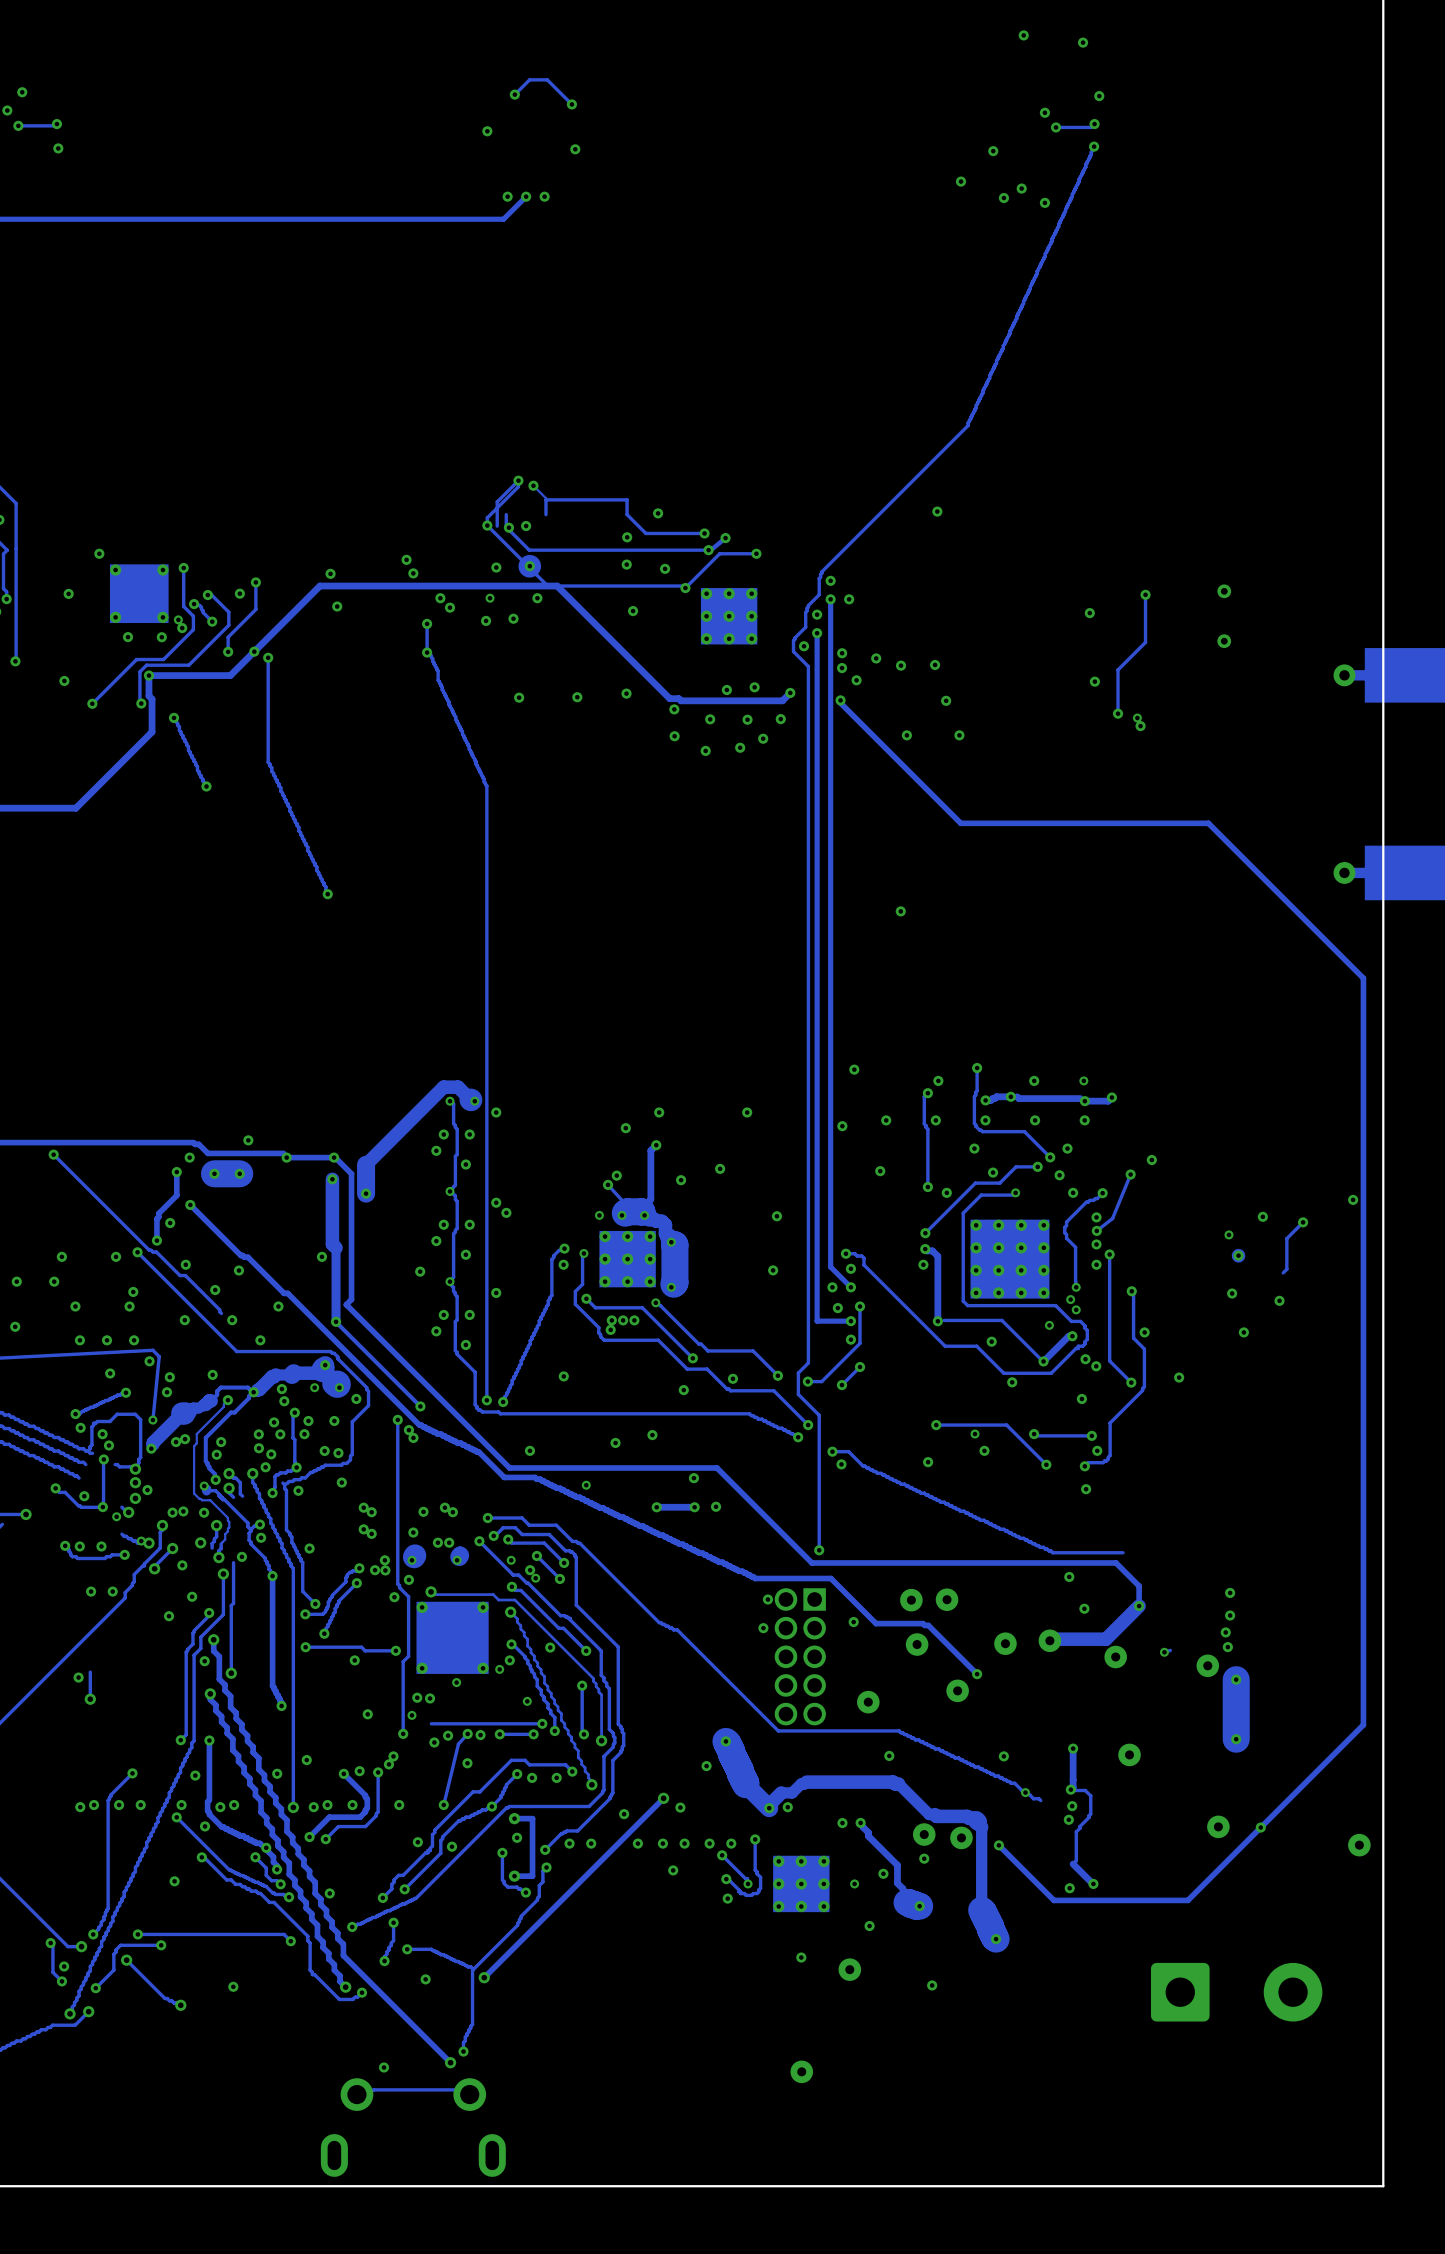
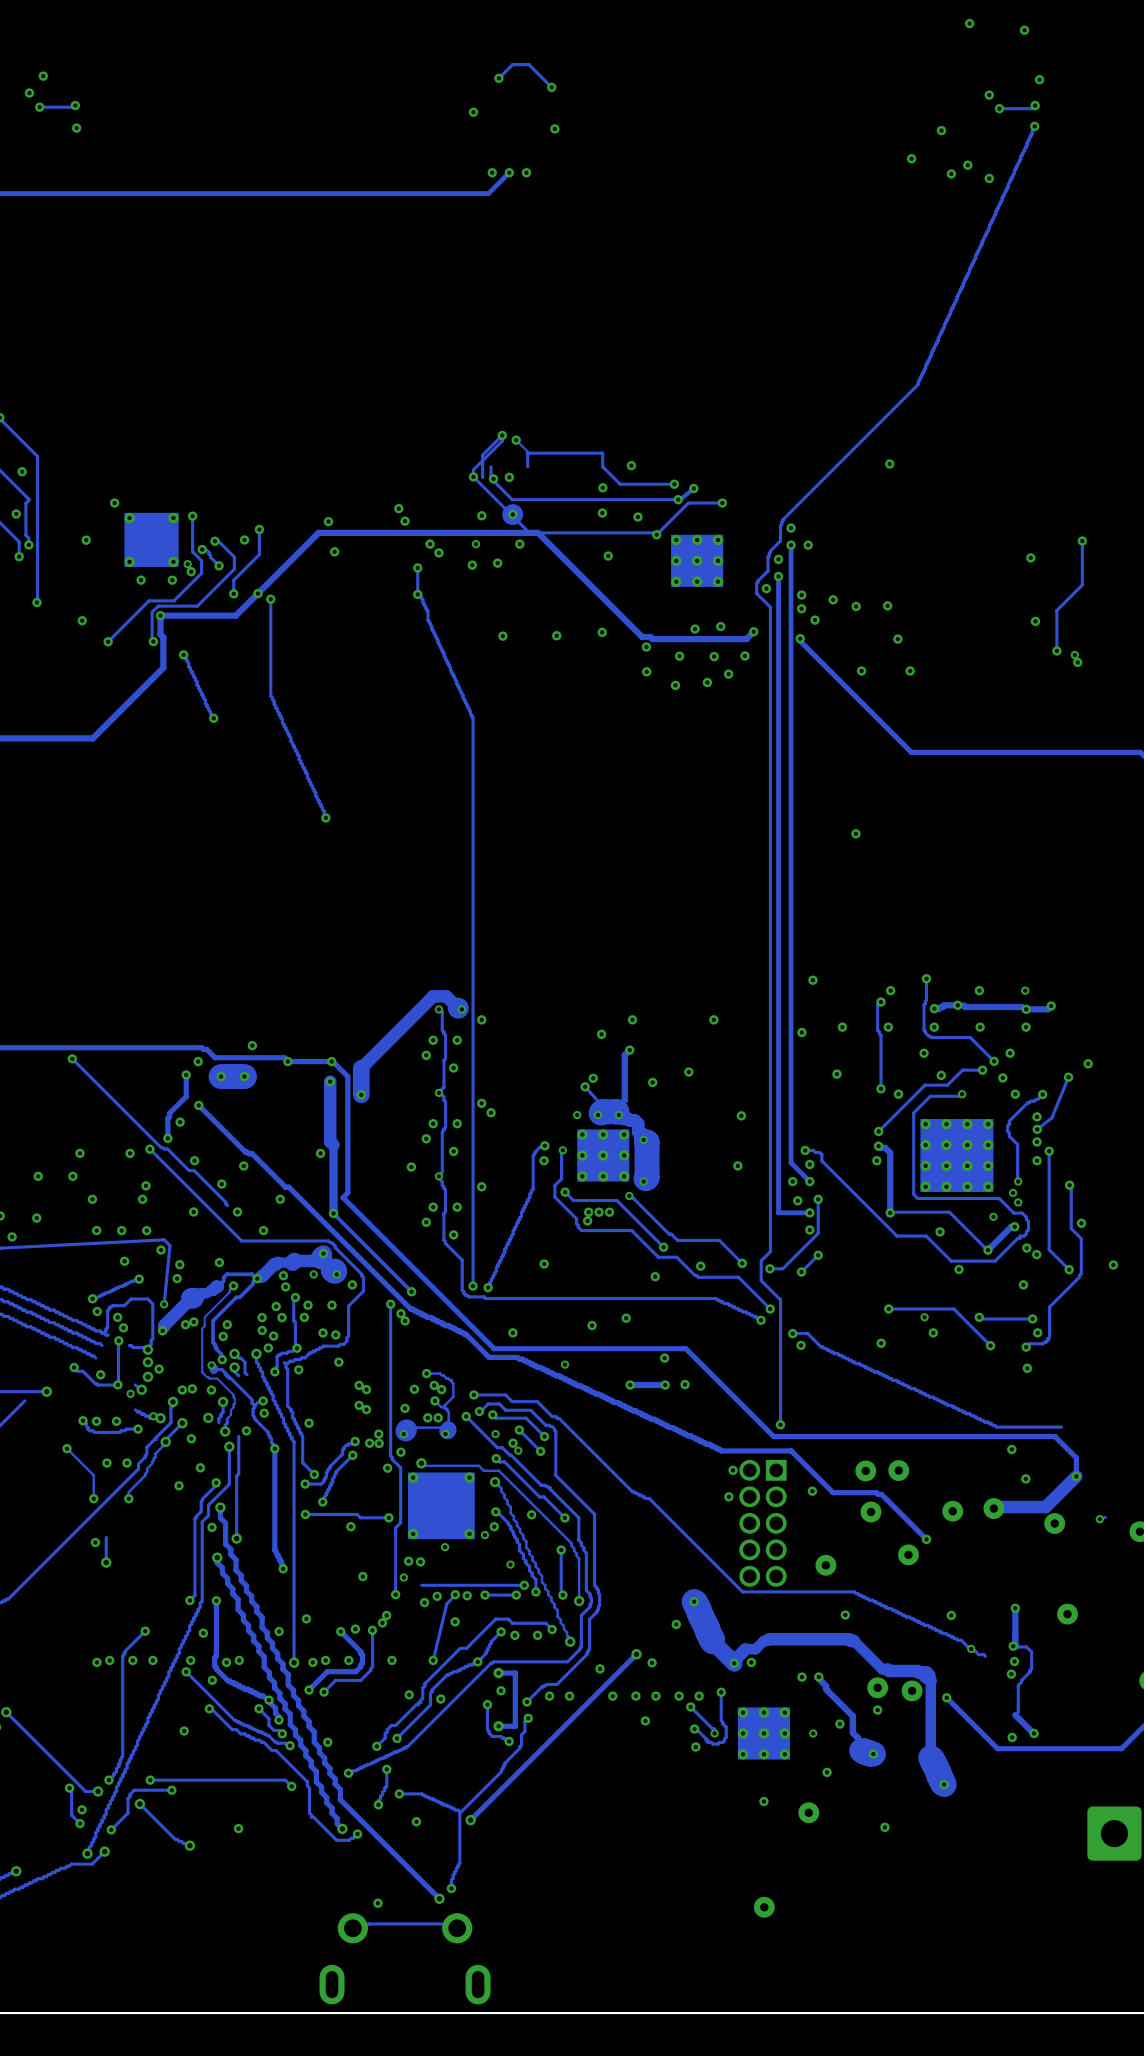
track: none -> (426, 1373) (440, 1373) (451, 1380) (453, 1396) (444, 1406)
via: none -> (426, 1373)
track: none -> (434, 1400) (441, 1407) (447, 1409) (448, 1421)
via: none -> (434, 1400)
track: none -> (440, 1427) (416, 1427)
track: none -> (163, 1445) (155, 1453) (145, 1475) (128, 1492) (128, 1498)
track: none -> (67, 1448) (93, 1475) (93, 1498)
via: none -> (67, 1448)
via: none -> (93, 1498)
via: none -> (128, 1498)

